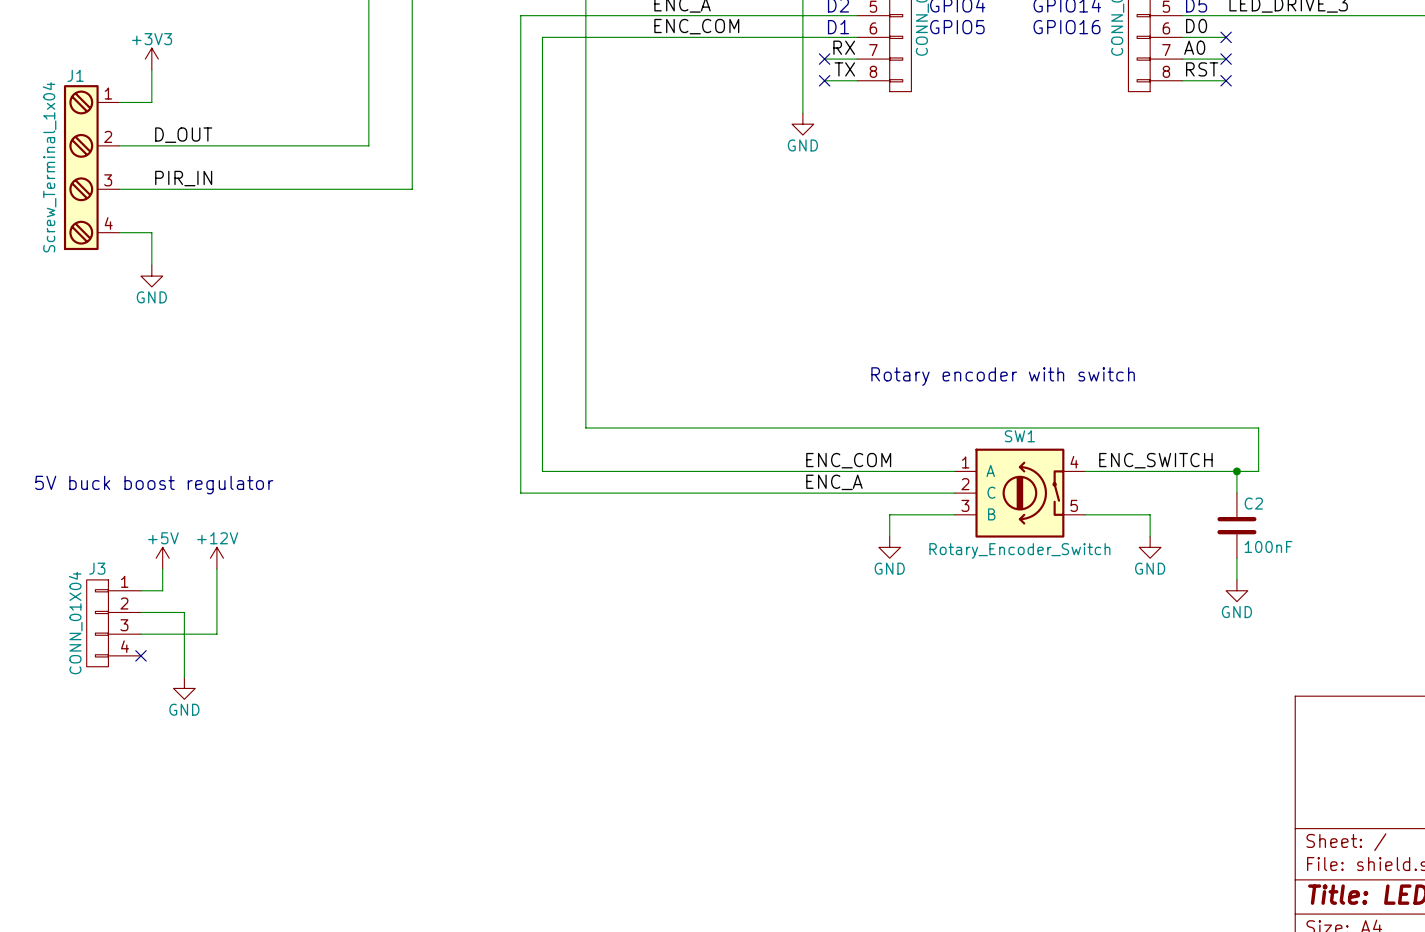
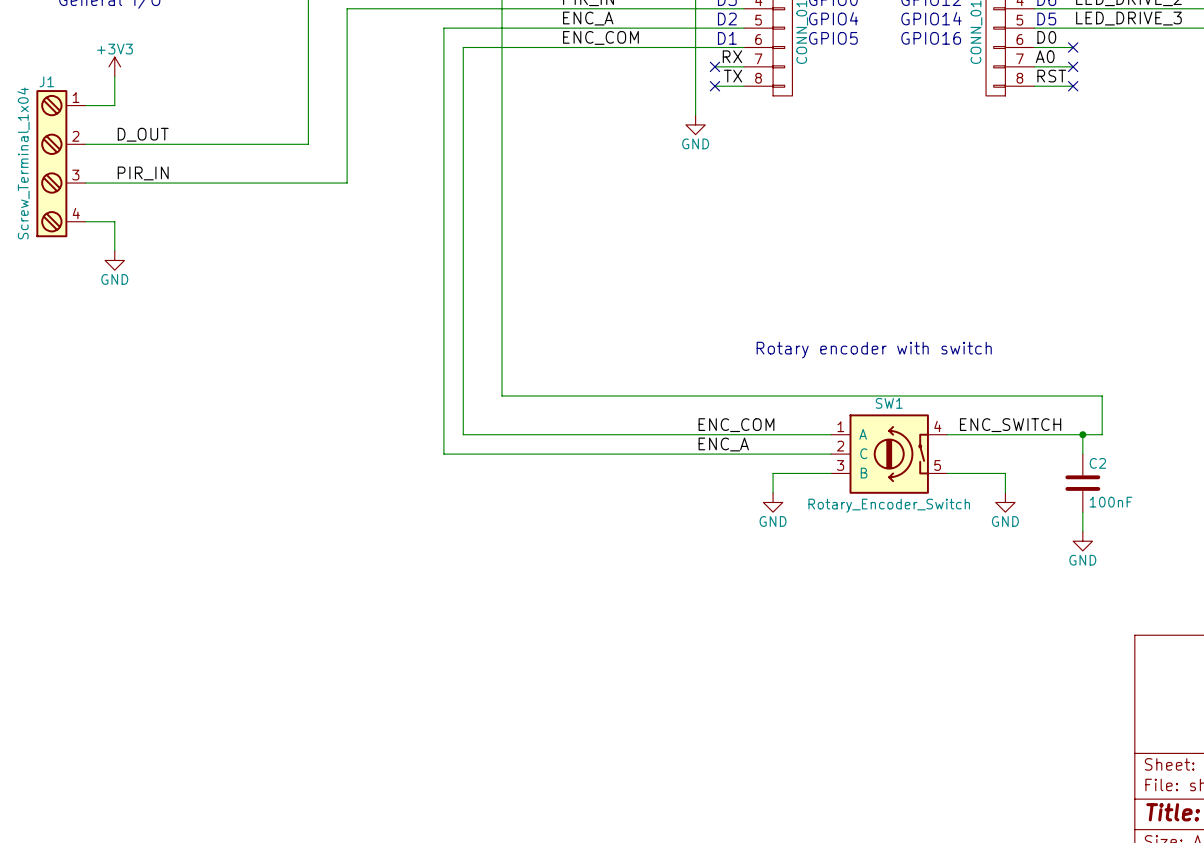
text: 5V buck boost regulator (154, 485) -> none
power symbol: +5V (162, 558) -> none
power symbol: +12V (216, 558) -> none
wire: (162, 569) (162, 590) (140, 590) -> none
wire: (216, 569) (216, 634) (140, 634) -> none
wire: (140, 612) (184, 612) (184, 677) -> none
J3: CONN_01X04 (113, 623) -> none
no-connect mark: (140, 655) -> none
power symbol: GND (184, 688) -> none

